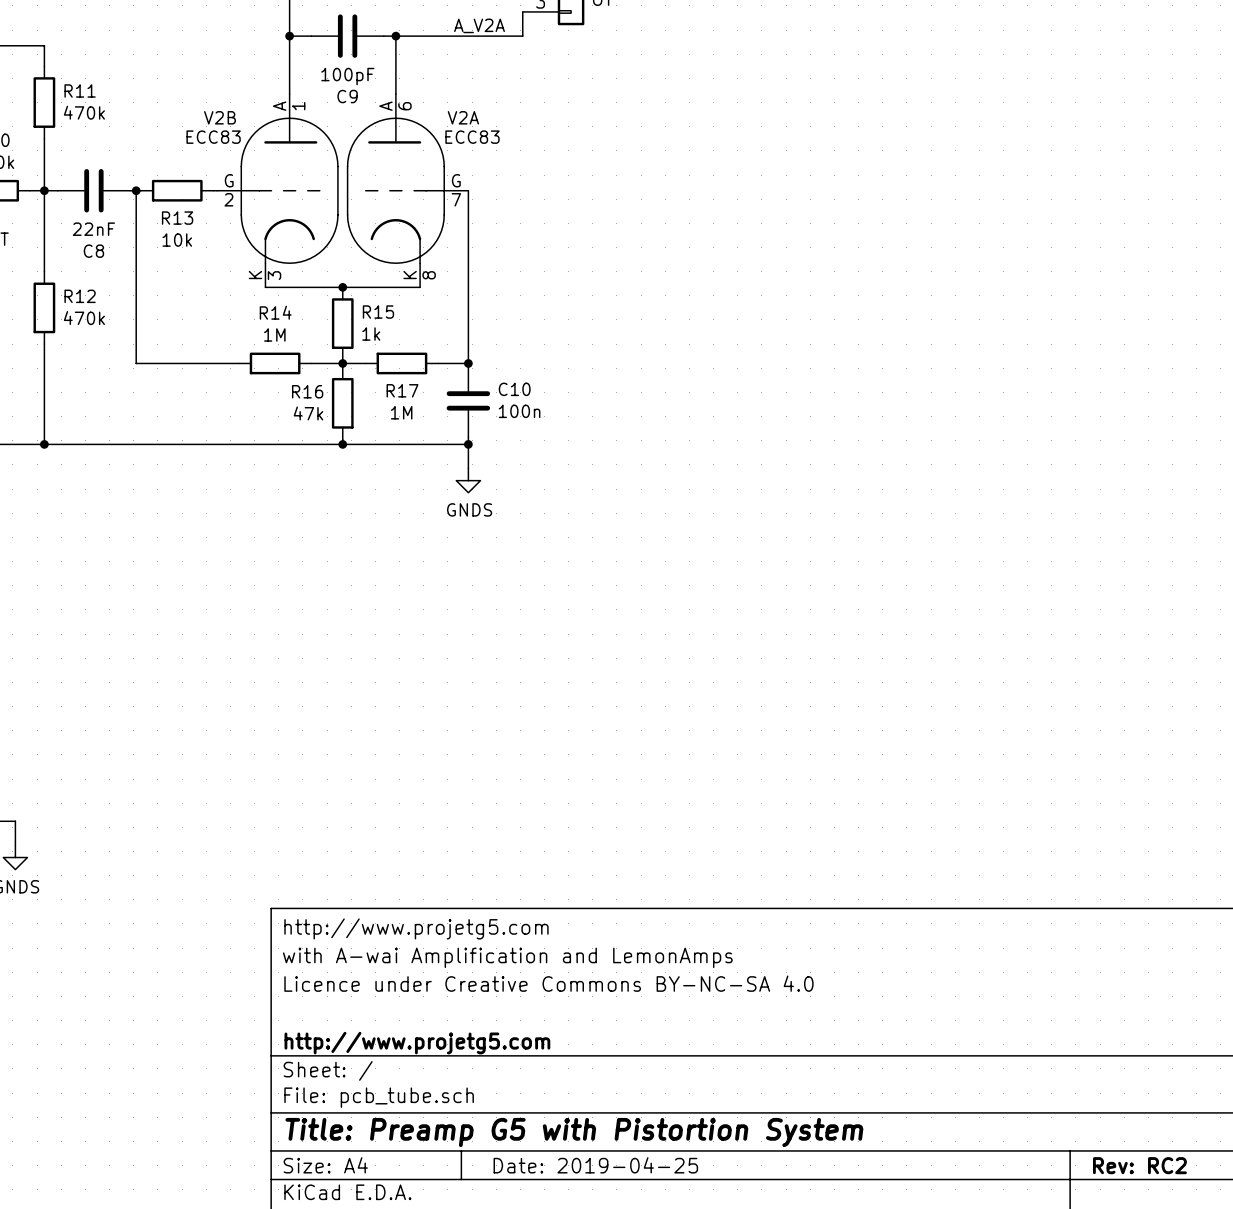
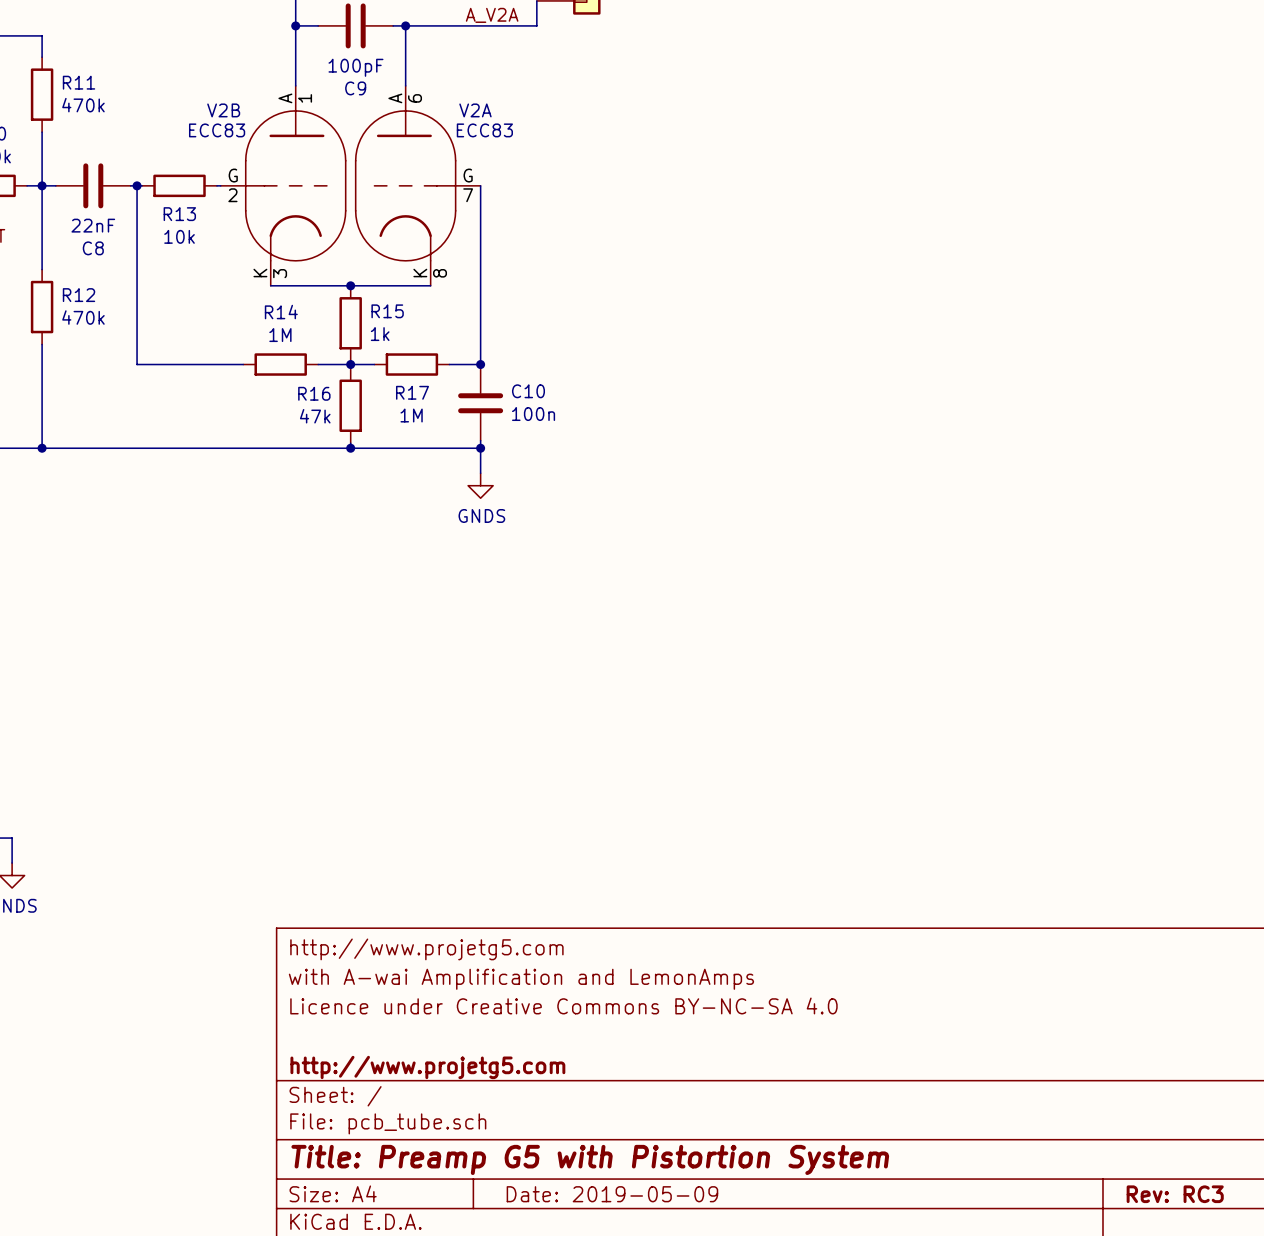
title block: Date: 2019-04-25 (595, 1165) -> Date: 2019-05-09 (612, 1194)
title block: Rev: RC2 (1139, 1165) -> Rev: RC3 (1175, 1194)

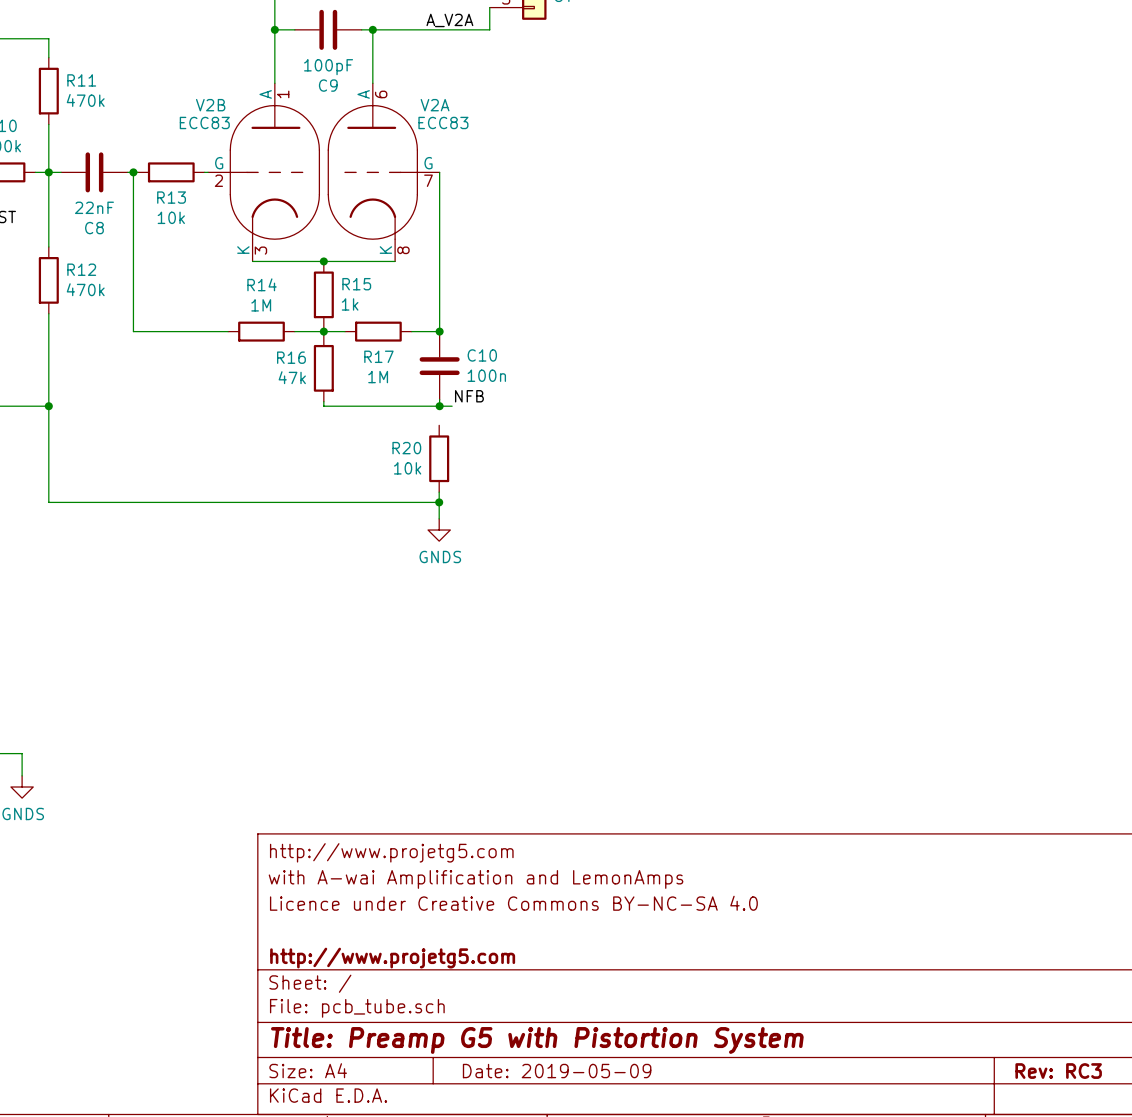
label: none -> NFB (469, 396)
wire: (42, 448) (350, 448) -> (48, 406) (48, 502) (439, 502)
junction: (350, 448) -> none
wire: (480, 448) (480, 473) -> (439, 406) (452, 406)
power symbol position: GNDS (480, 485) -> GNDS (439, 530)
R20: none -> 10k (439, 458)
wire: none -> (439, 492) (439, 518)
junction: none -> (439, 502)

